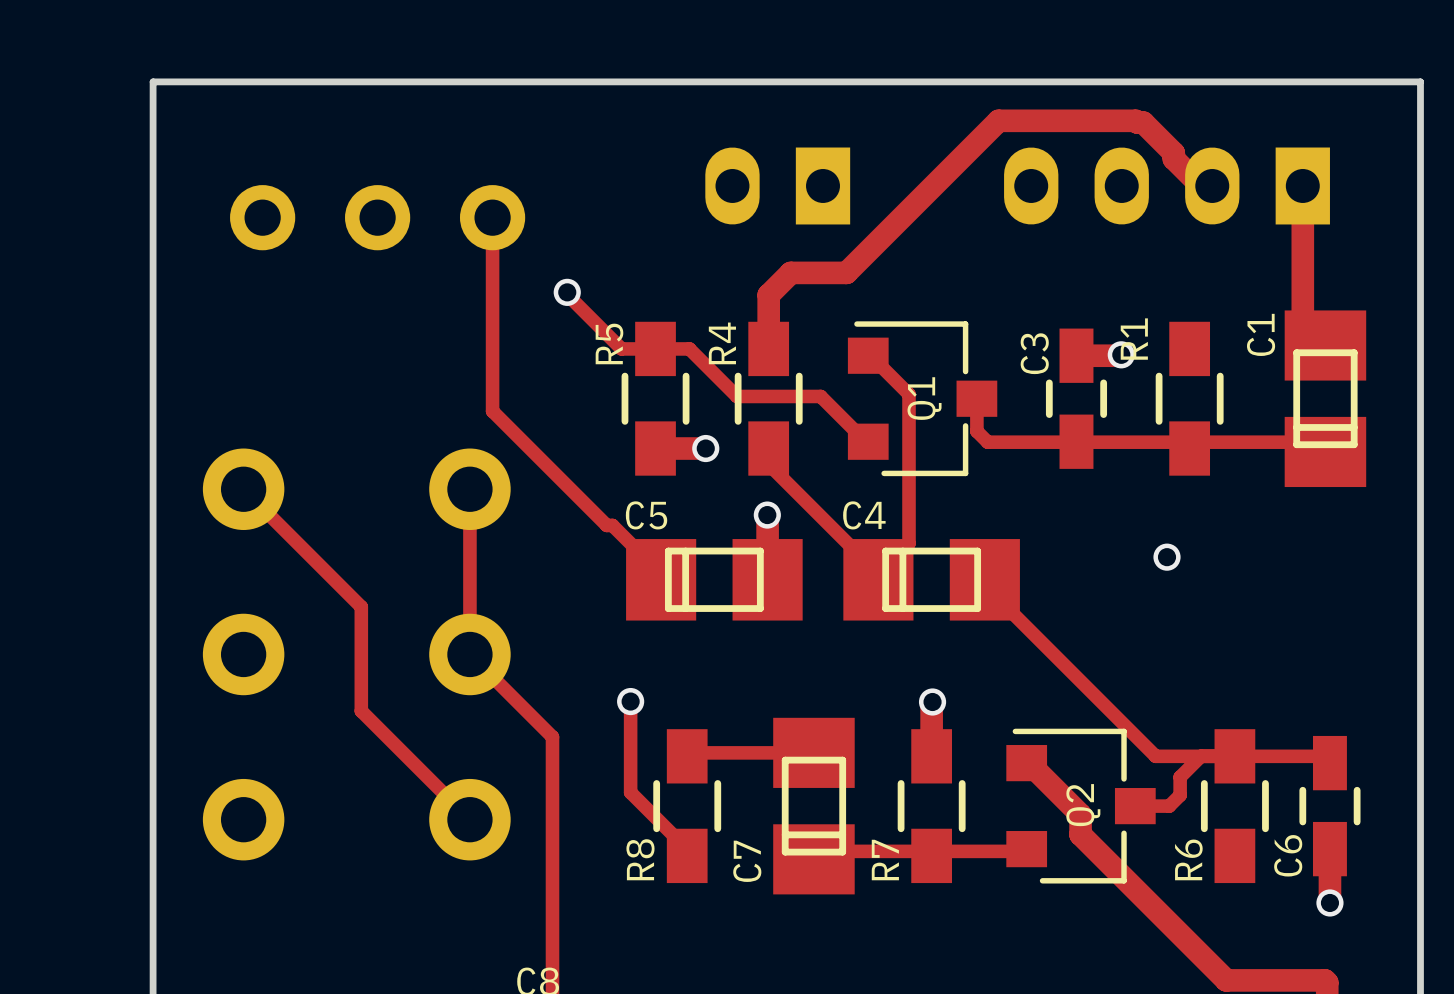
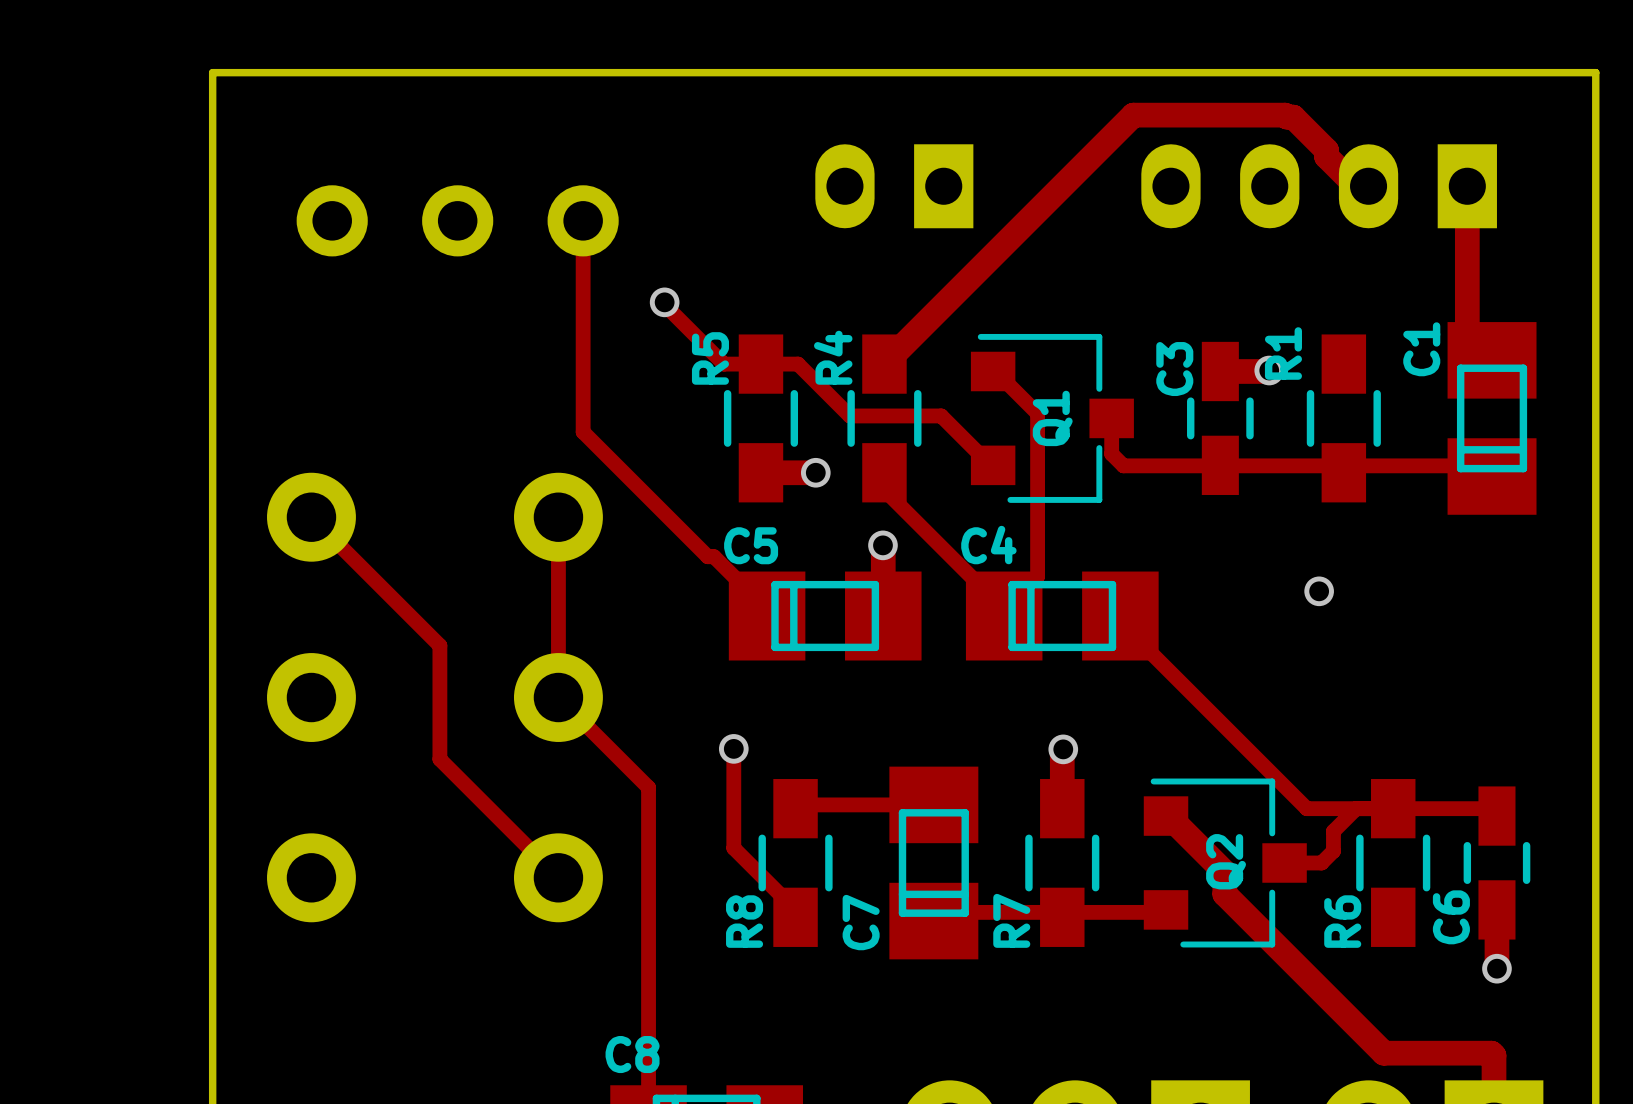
track: (998, 120) (846, 272) (790, 272) (768, 295) (768, 348) -> (1135, 115) (884, 364)

